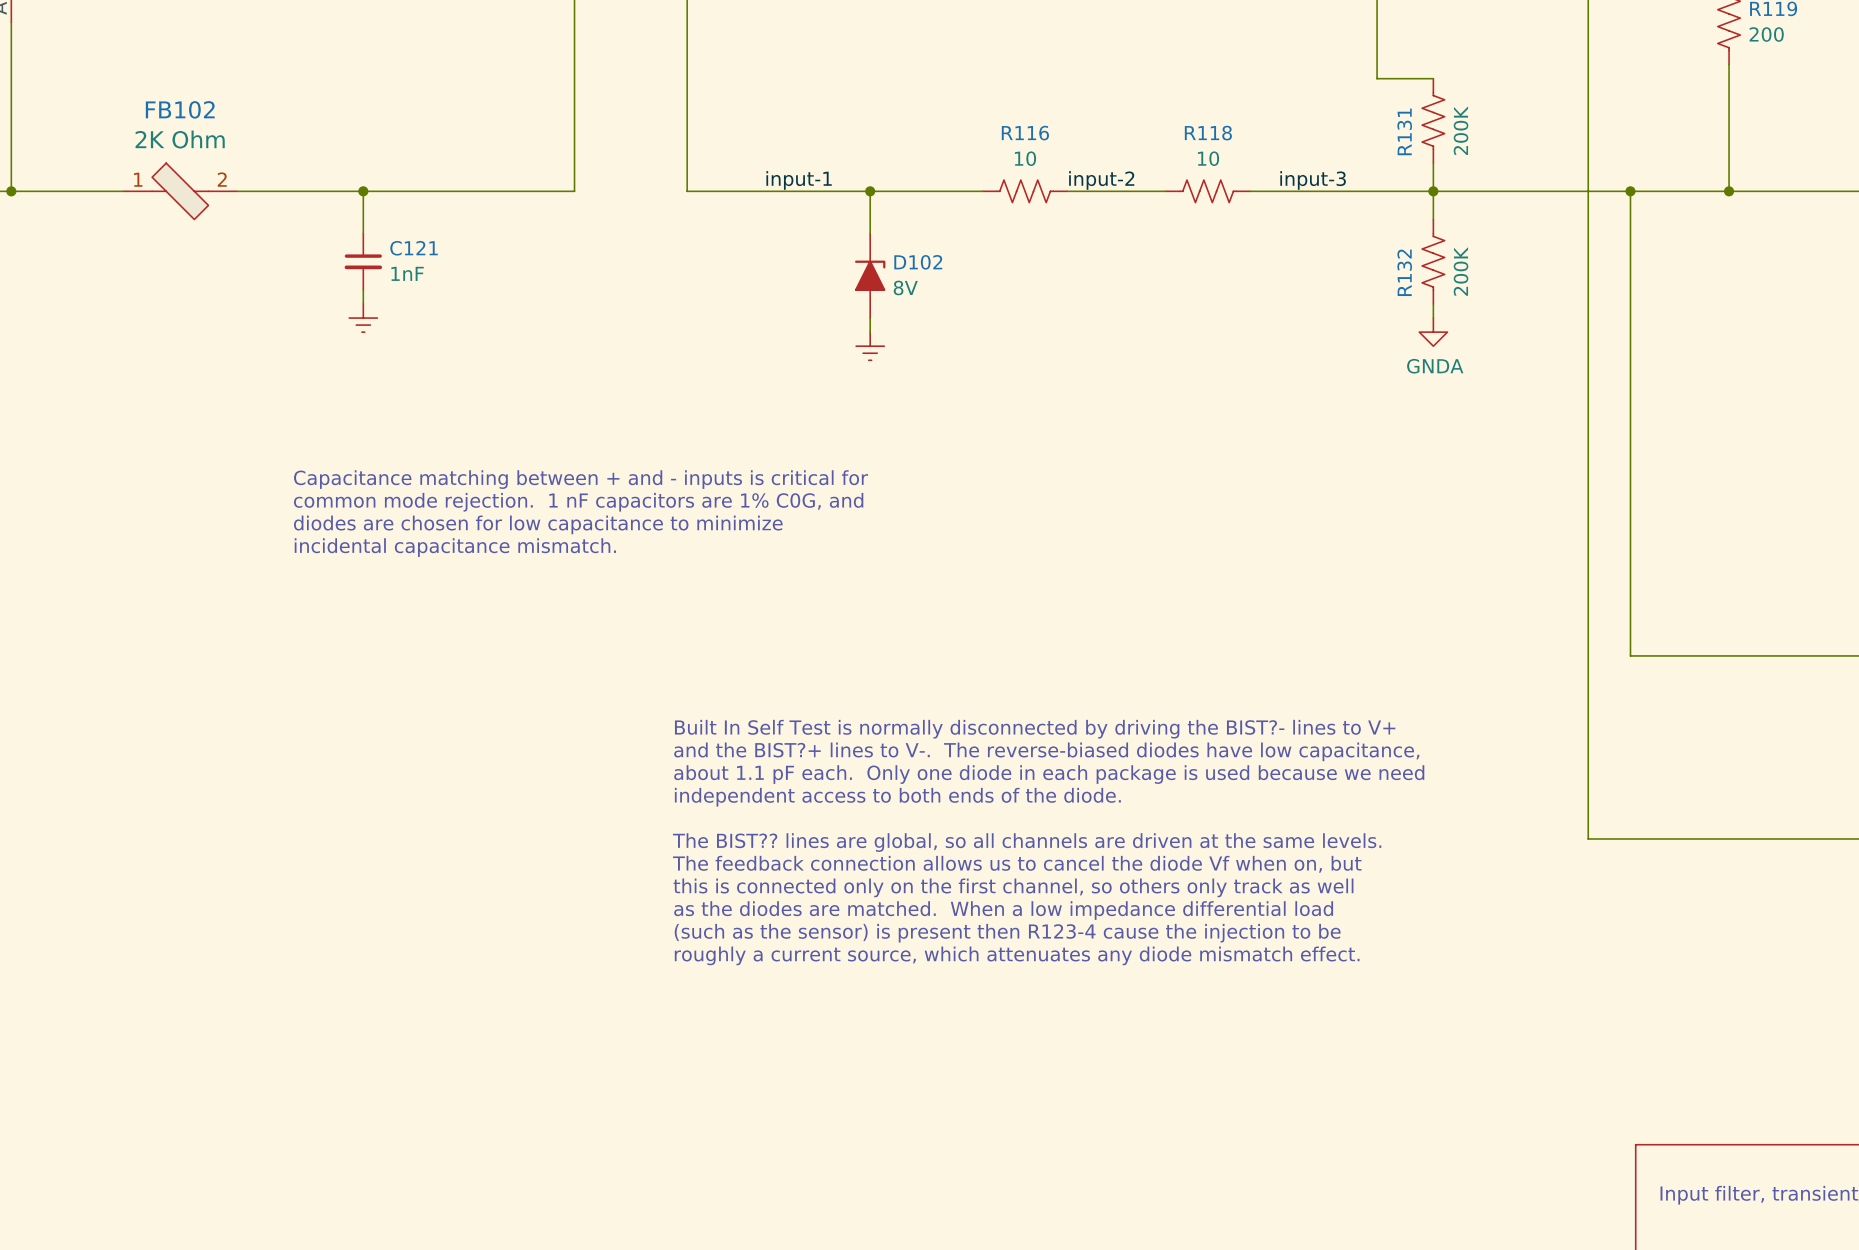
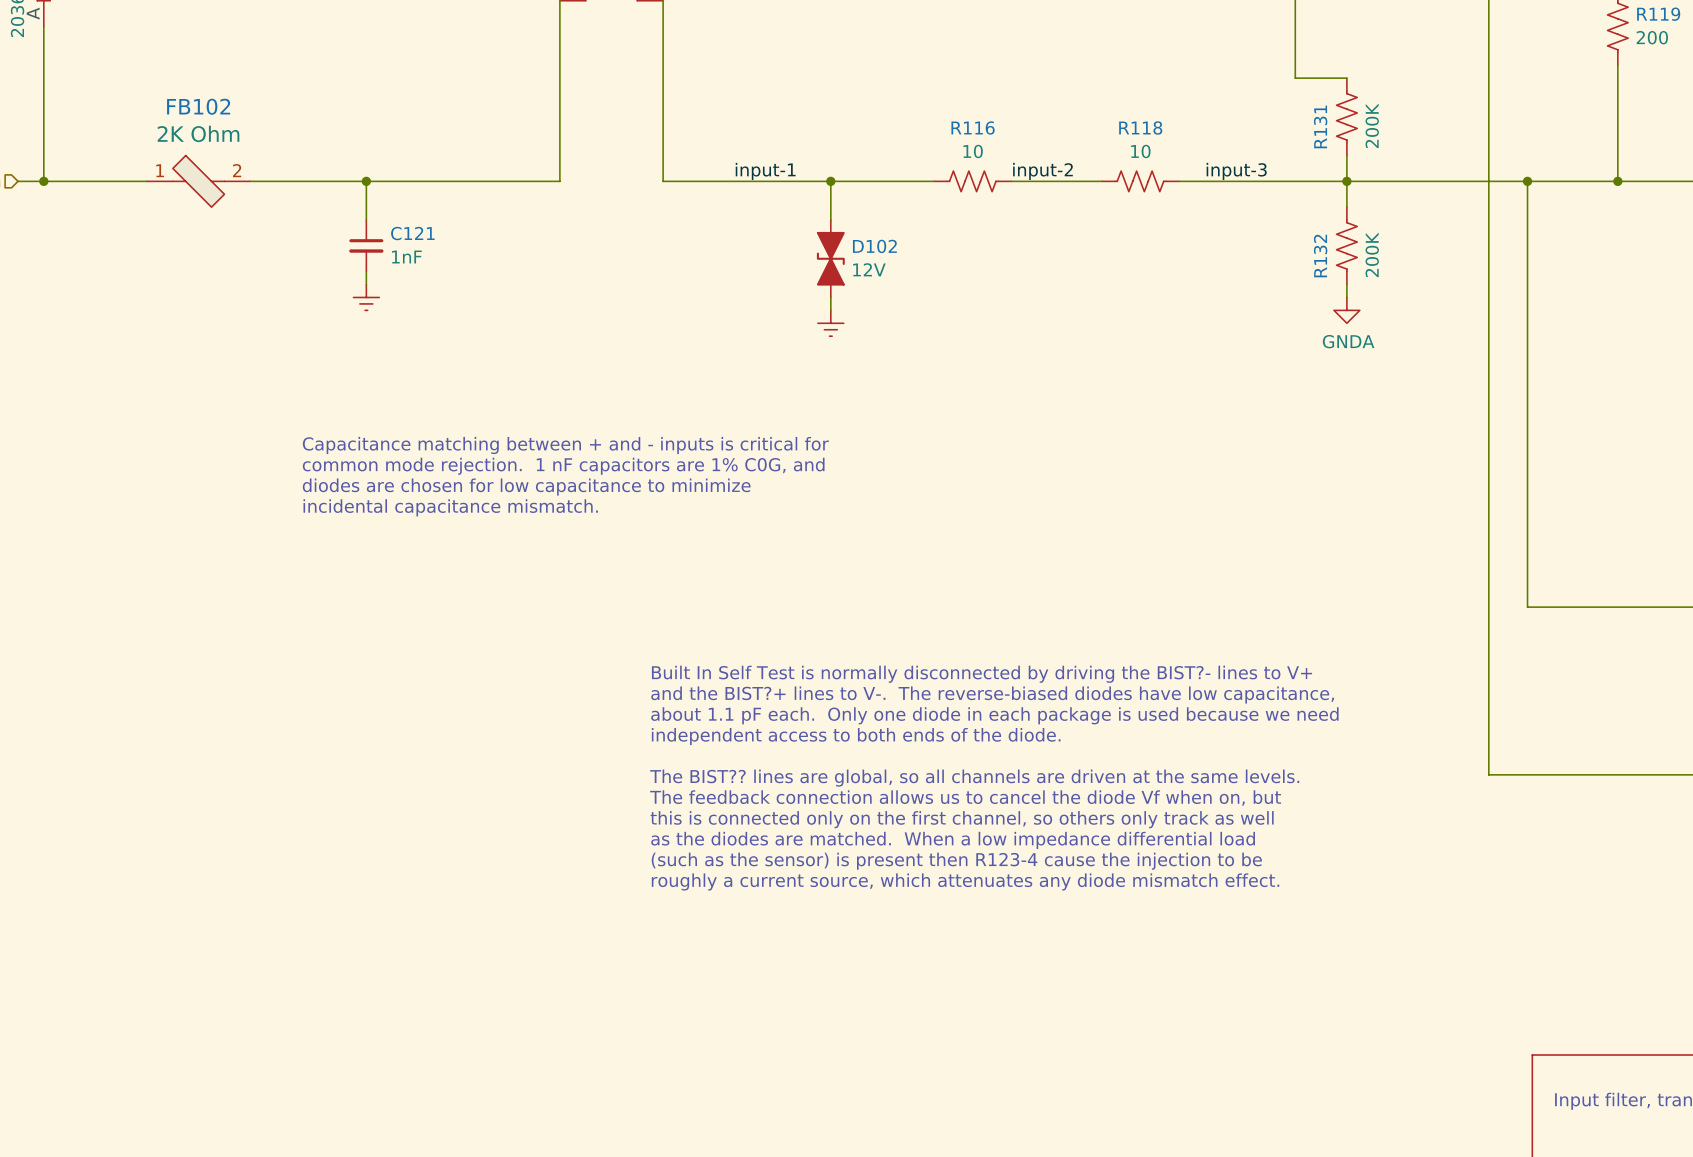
D102 symbol: [854, 233, 886, 319] -> [816, 220, 845, 298]
D102 value: 8V (905, 287) -> 12V (869, 269)

